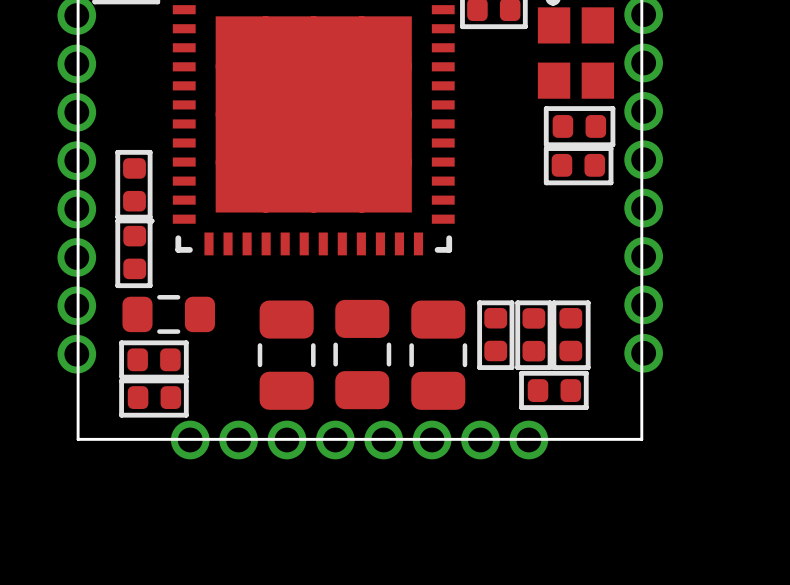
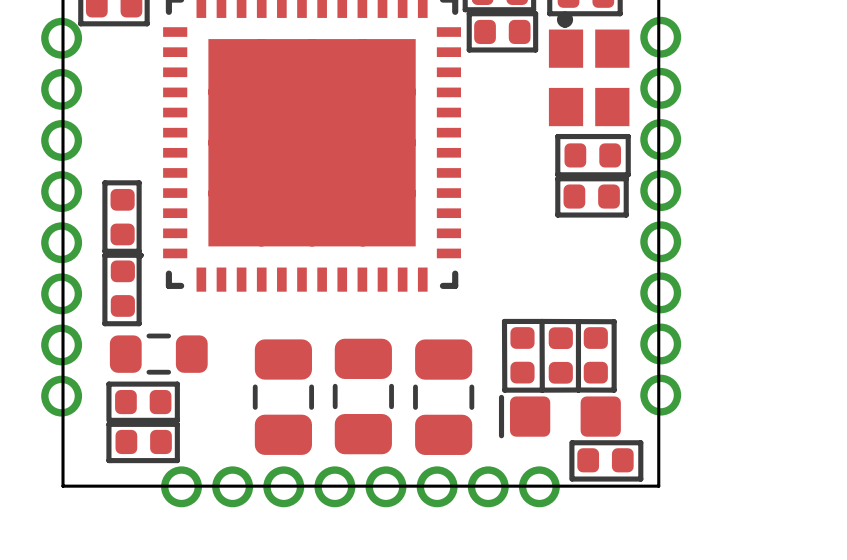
line: none -> (542, 321) (504, 321) (504, 390) (542, 390)
line: none -> (542, 321) (614, 321) (614, 390) (578, 390)
line: none -> (542, 321) (542, 390)
line: none -> (578, 321) (578, 390)
line: (479, 302) (479, 367) (511, 367) (511, 302) (479, 302) -> none
line: (517, 302) (550, 302) (550, 367) (517, 367) (517, 302) -> none
line: (553, 302) (588, 302) (588, 367) (553, 367) (553, 302) -> none
part: none -> (522, 355)
part: none -> (560, 355)
part: none -> (595, 355)
part: (495, 334) -> none
part: (533, 334) -> none
part: (570, 334) -> none
line: none -> (542, 390) (578, 390)
line: (521, 373) (586, 373) (586, 407) (521, 407) (521, 373) -> none
part footprint: [527, 379, 582, 402] -> [498, 394, 621, 439]
line: none -> (571, 442) (571, 478)
line: none -> (572, 442) (640, 442) (640, 479) (572, 479)
part: none -> (605, 460)

